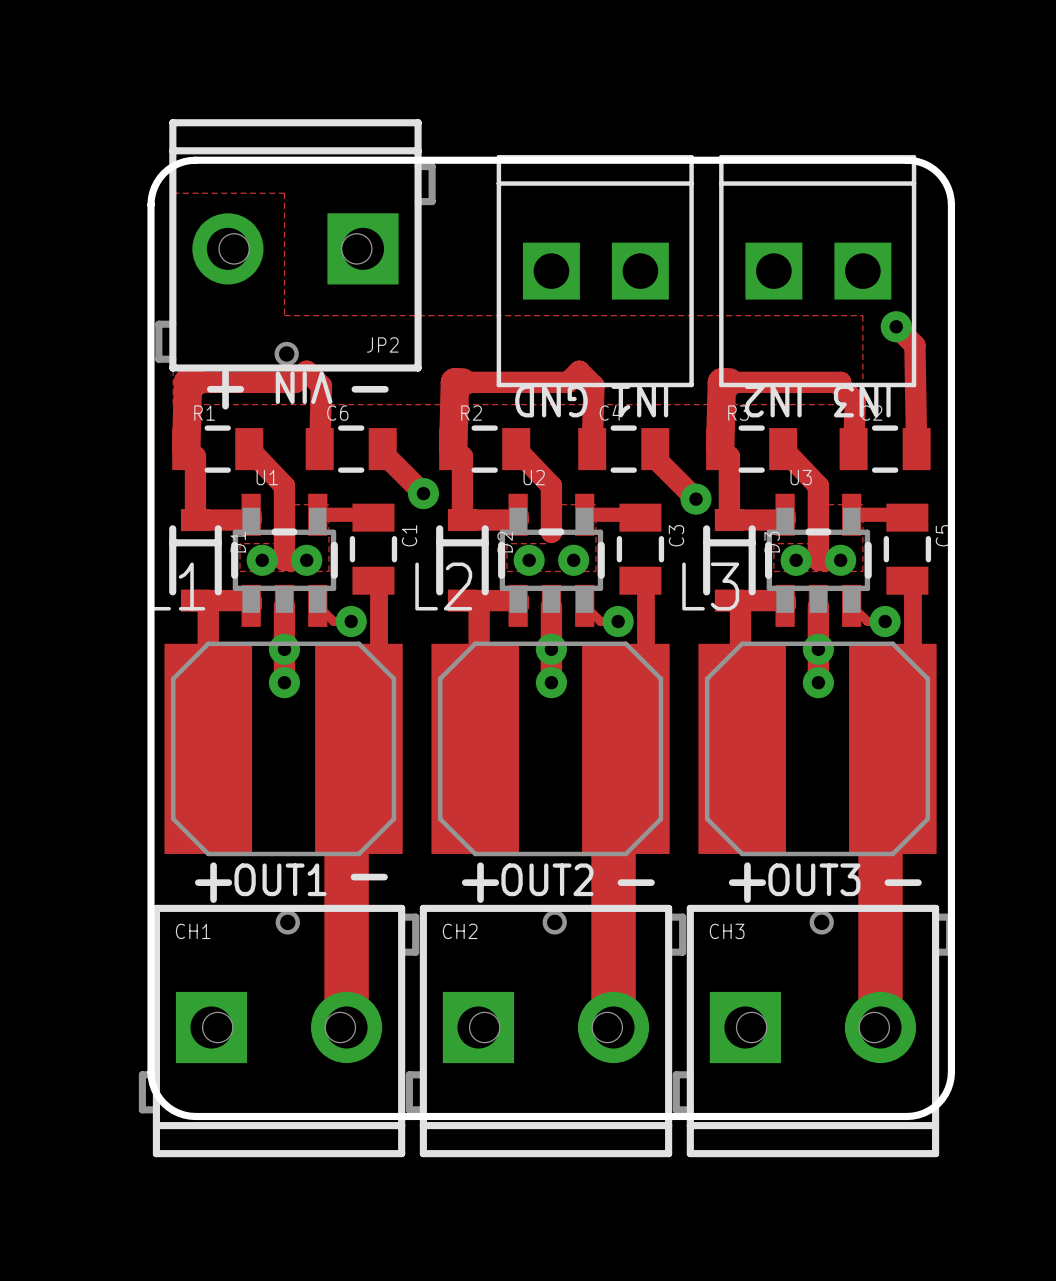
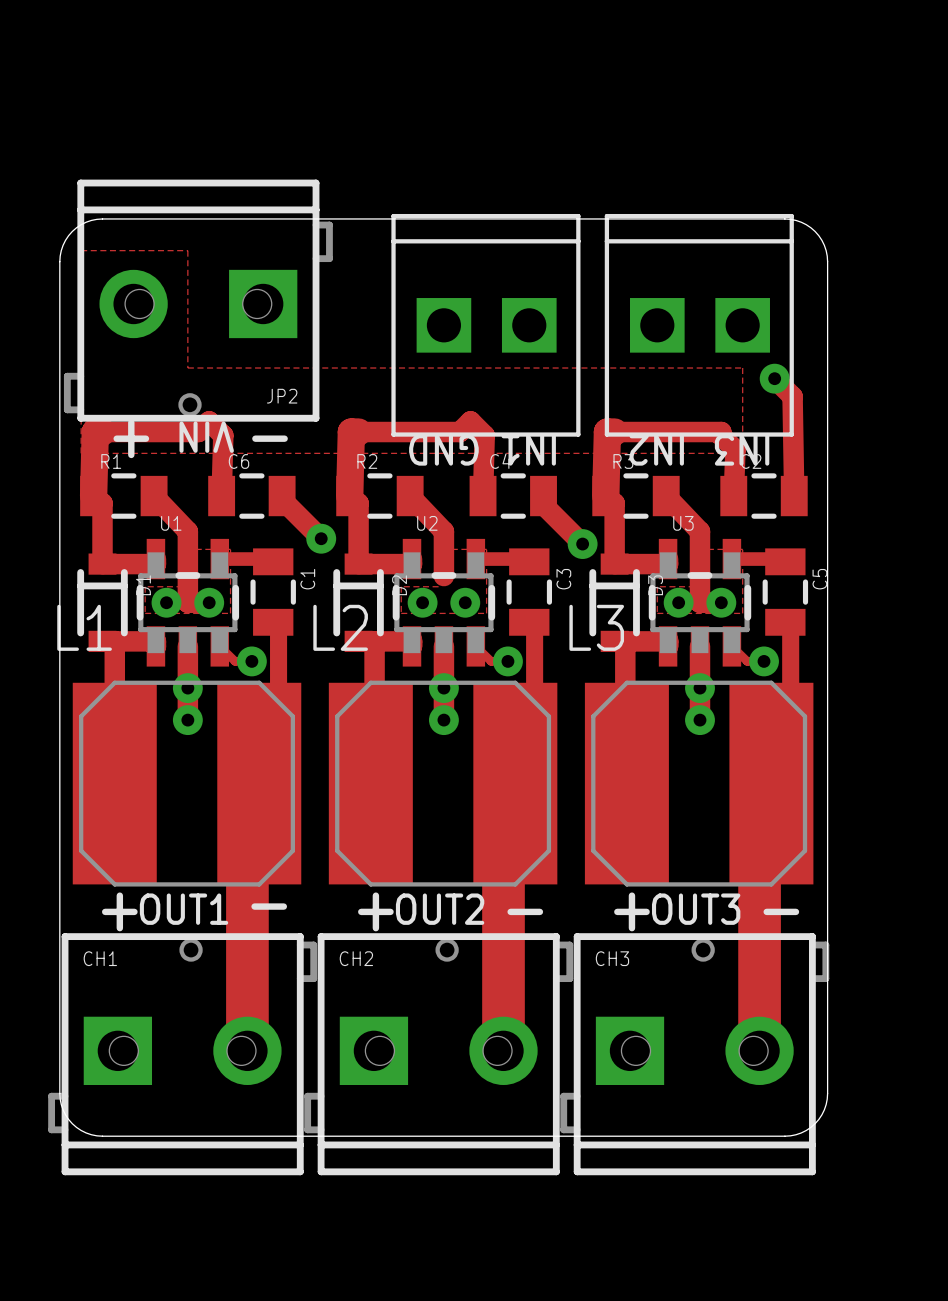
board edge width: thick (195, 160) (906, 160) (918, 161) (929, 166) (942, 177) (949, 193) (951, 204) (951, 1071) (949, 1083) (945, 1094) (934, 1107) (918, 1114) (906, 1116) (195, 1116) (183, 1114) (173, 1110) (160, 1099) (152, 1083) (151, 1071) (151, 204) (154, 187) (164, 173) (178, 163) (195, 160) -> thin (102, 218) (784, 218) (806, 224) (818, 235) (826, 250) (827, 261) (827, 1093) (821, 1114) (810, 1127) (795, 1134) (784, 1136) (102, 1136) (81, 1130) (68, 1119) (61, 1104) (59, 1093) (59, 261) (63, 245) (72, 231) (86, 222) (102, 218)

